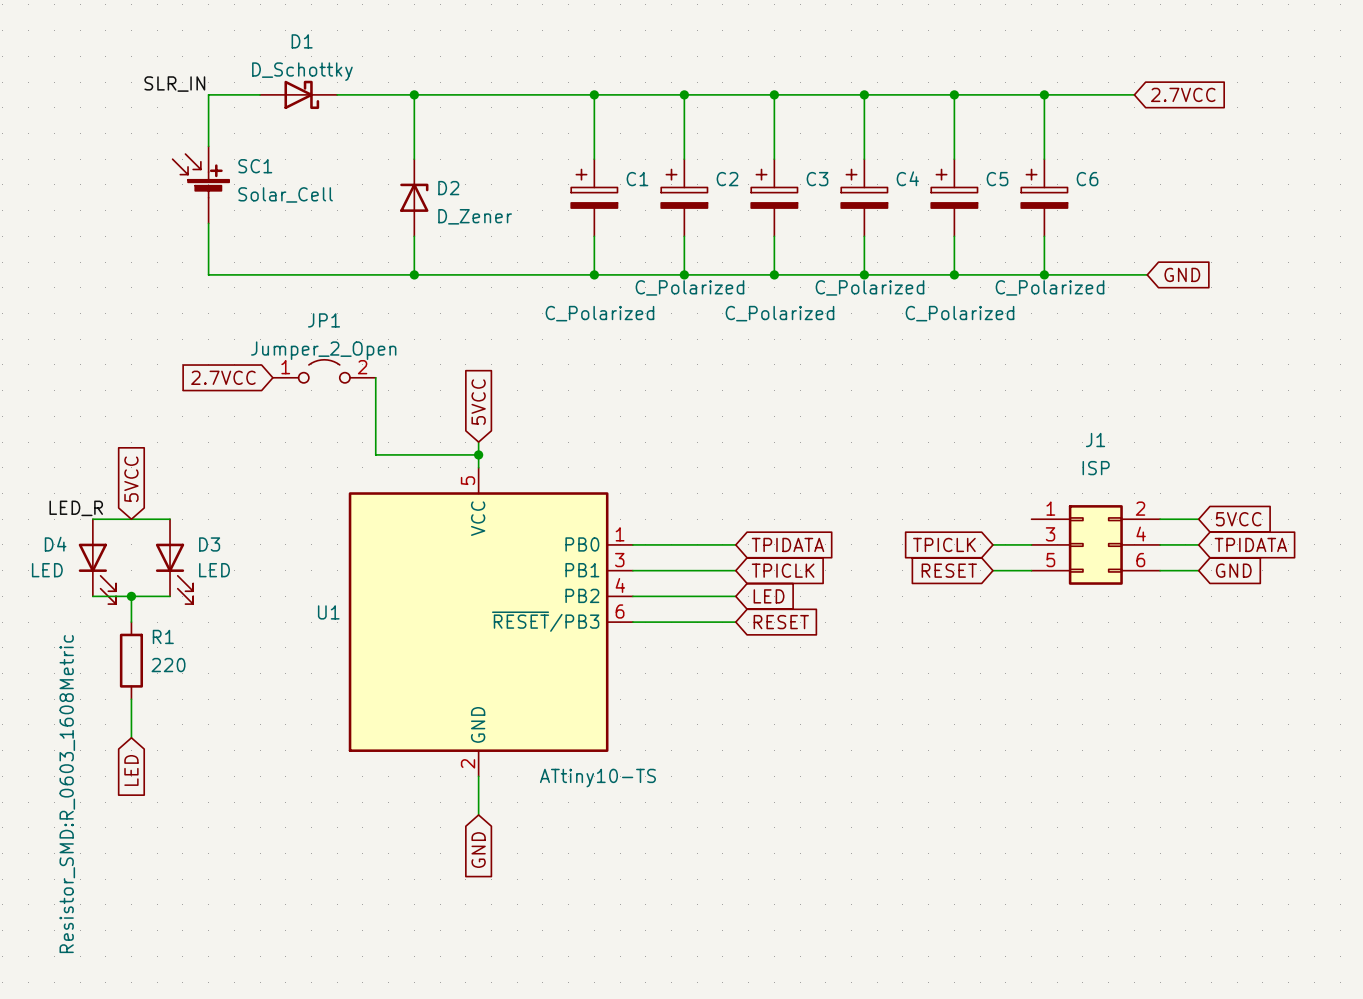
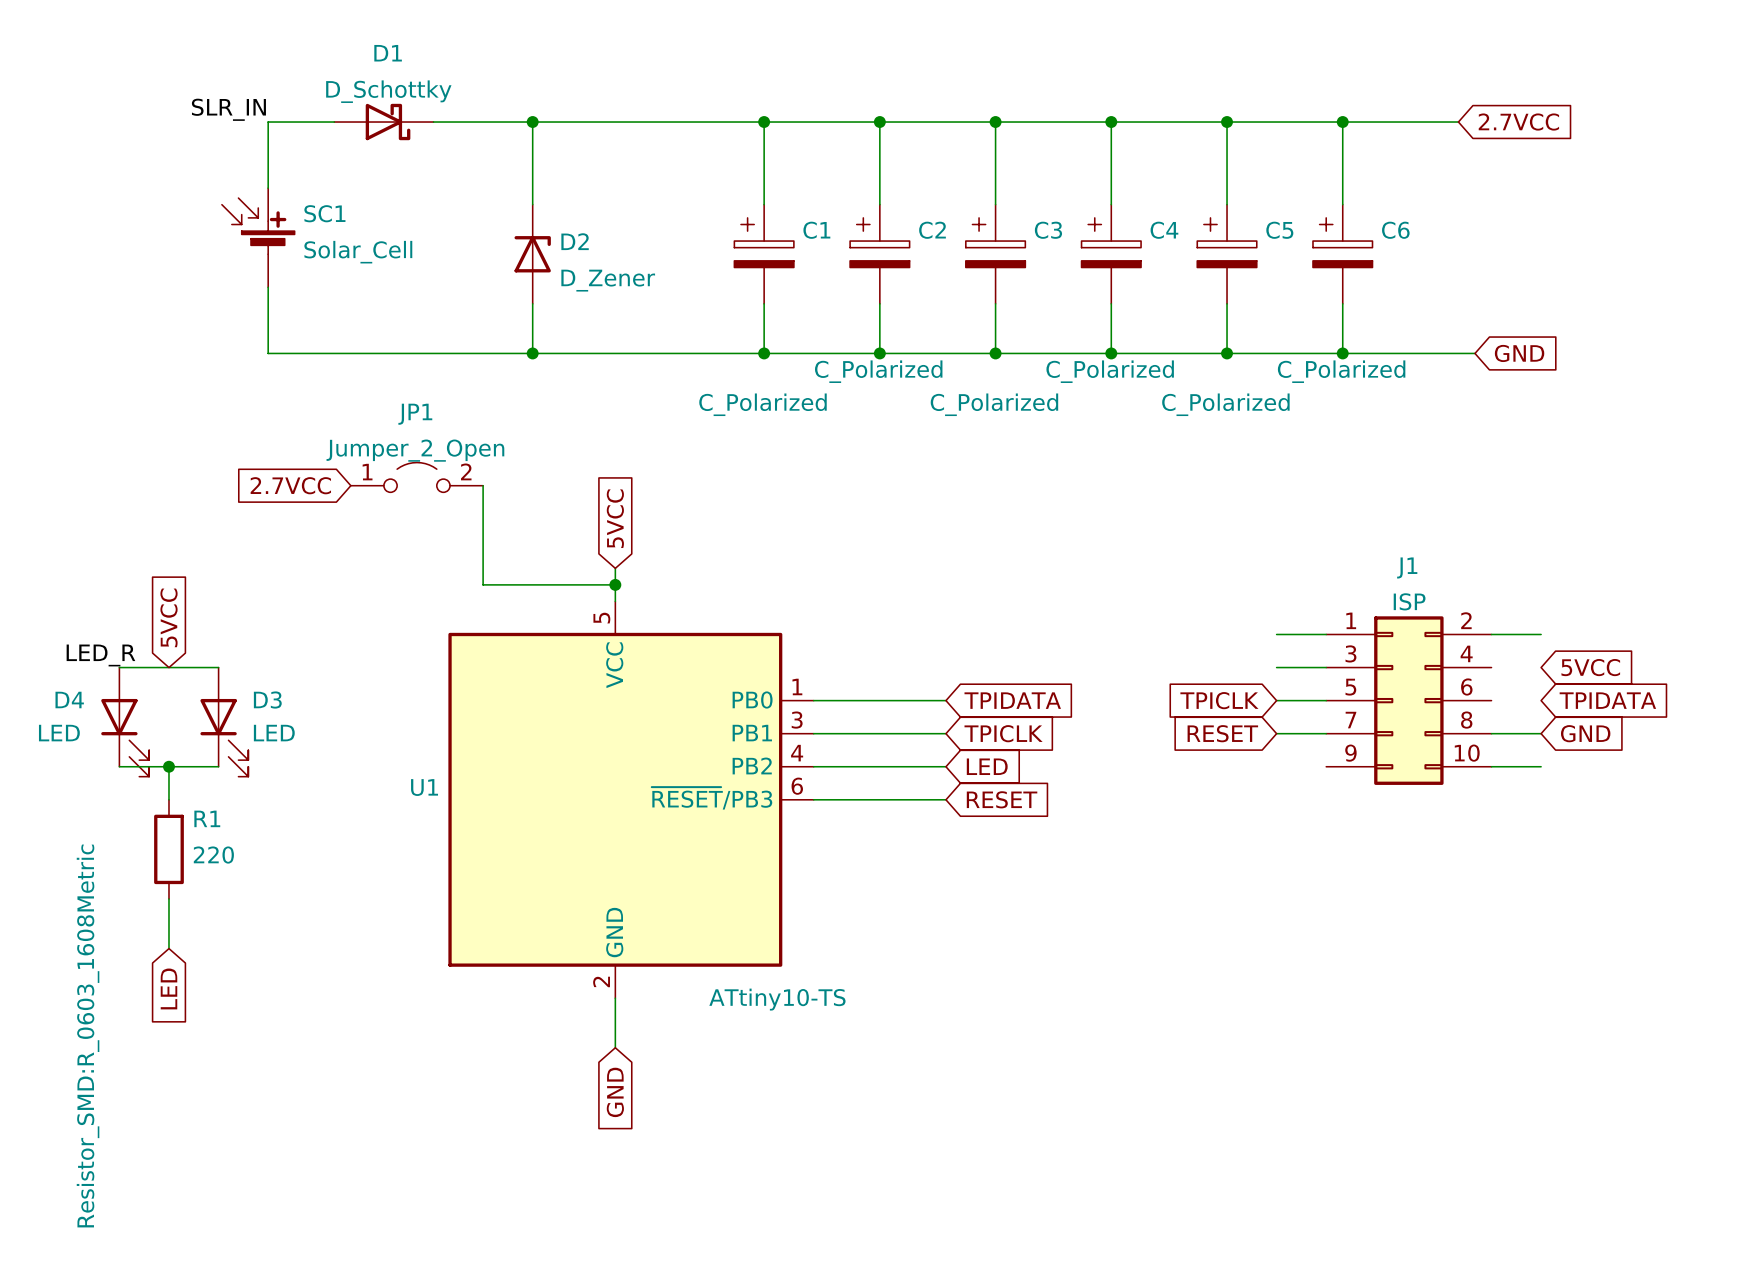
wire: none -> (1491, 634) (1541, 634)
J1 symbol: [1031, 505, 1161, 585] -> [1326, 616, 1492, 785]
wire: (1160, 519) (1198, 519) -> (1276, 634) (1326, 634)
wire: (1160, 544) (1198, 544) -> (1276, 667) (1326, 667)
wire: none -> (1491, 766) (1541, 766)

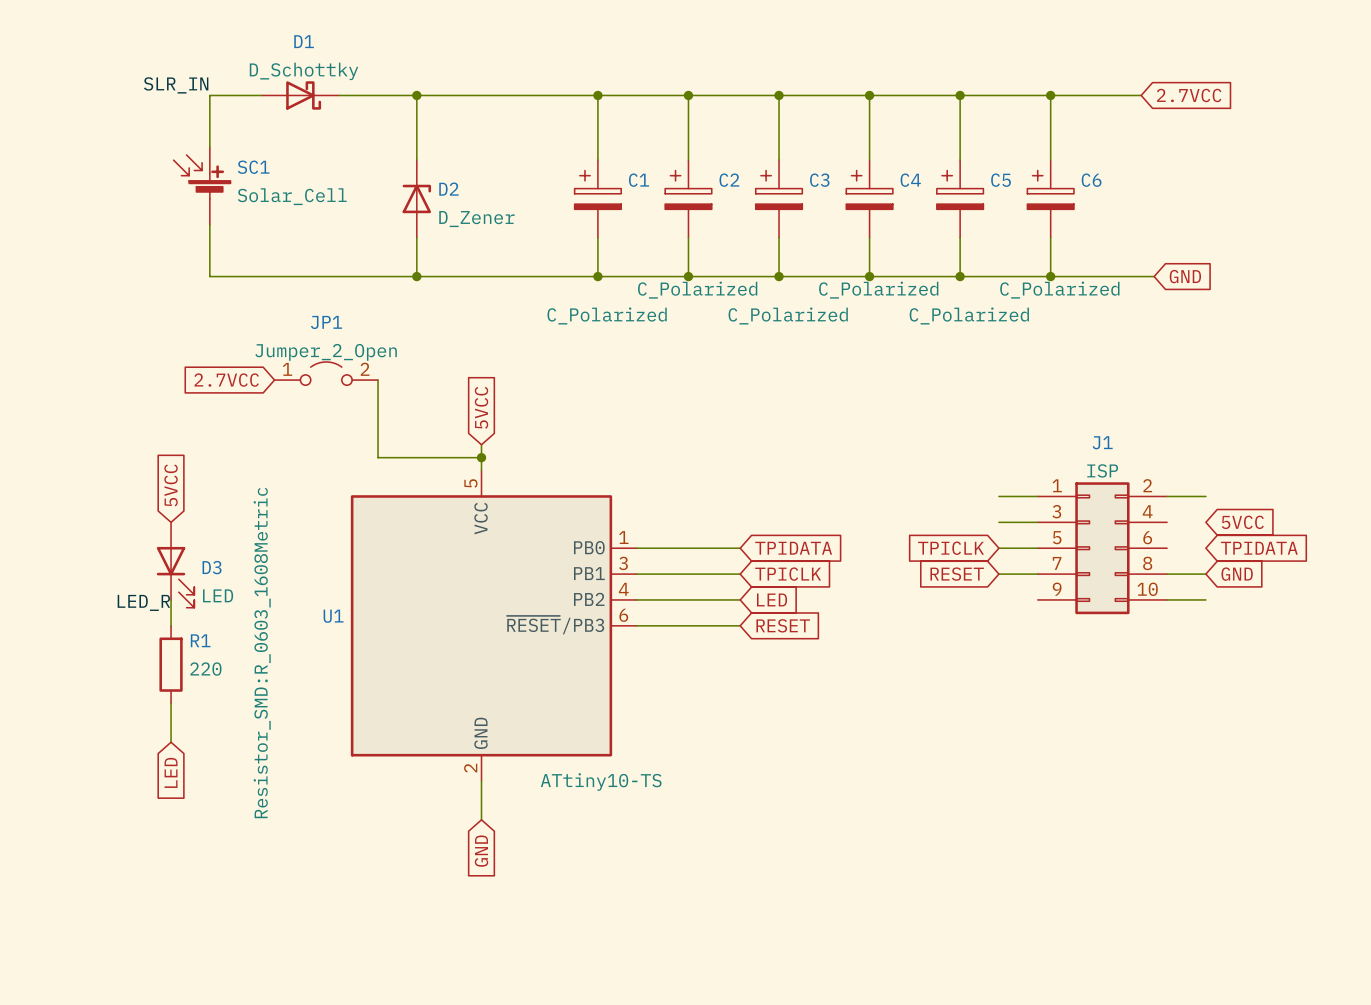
global label position: 5VCC (169, 617) -> 5VCC (171, 485)
label position: LED_R (100, 655) -> LED_R (143, 602)
wire: (119, 667) (218, 667) -> none
D3 name position: D3 (267, 700) -> D3 (212, 567)
D4: LED (125, 722) -> none
D3 value position: LED (274, 733) -> LED (218, 595)
wire: (119, 766) (218, 766) -> (171, 625) (171, 599)
wire: (168, 766) (168, 799) -> none
junction: (168, 766) -> none
R1 position: (168, 849) -> (171, 664)
wire: (168, 899) (168, 948) -> (171, 703) (171, 742)
global label position: LED (168, 988) -> LED (171, 772)
R1 text position: Resistor_SMD:R_0603_1608Metric (88, 1036) -> Resistor_SMD:R_0603_1608Metric (262, 653)

